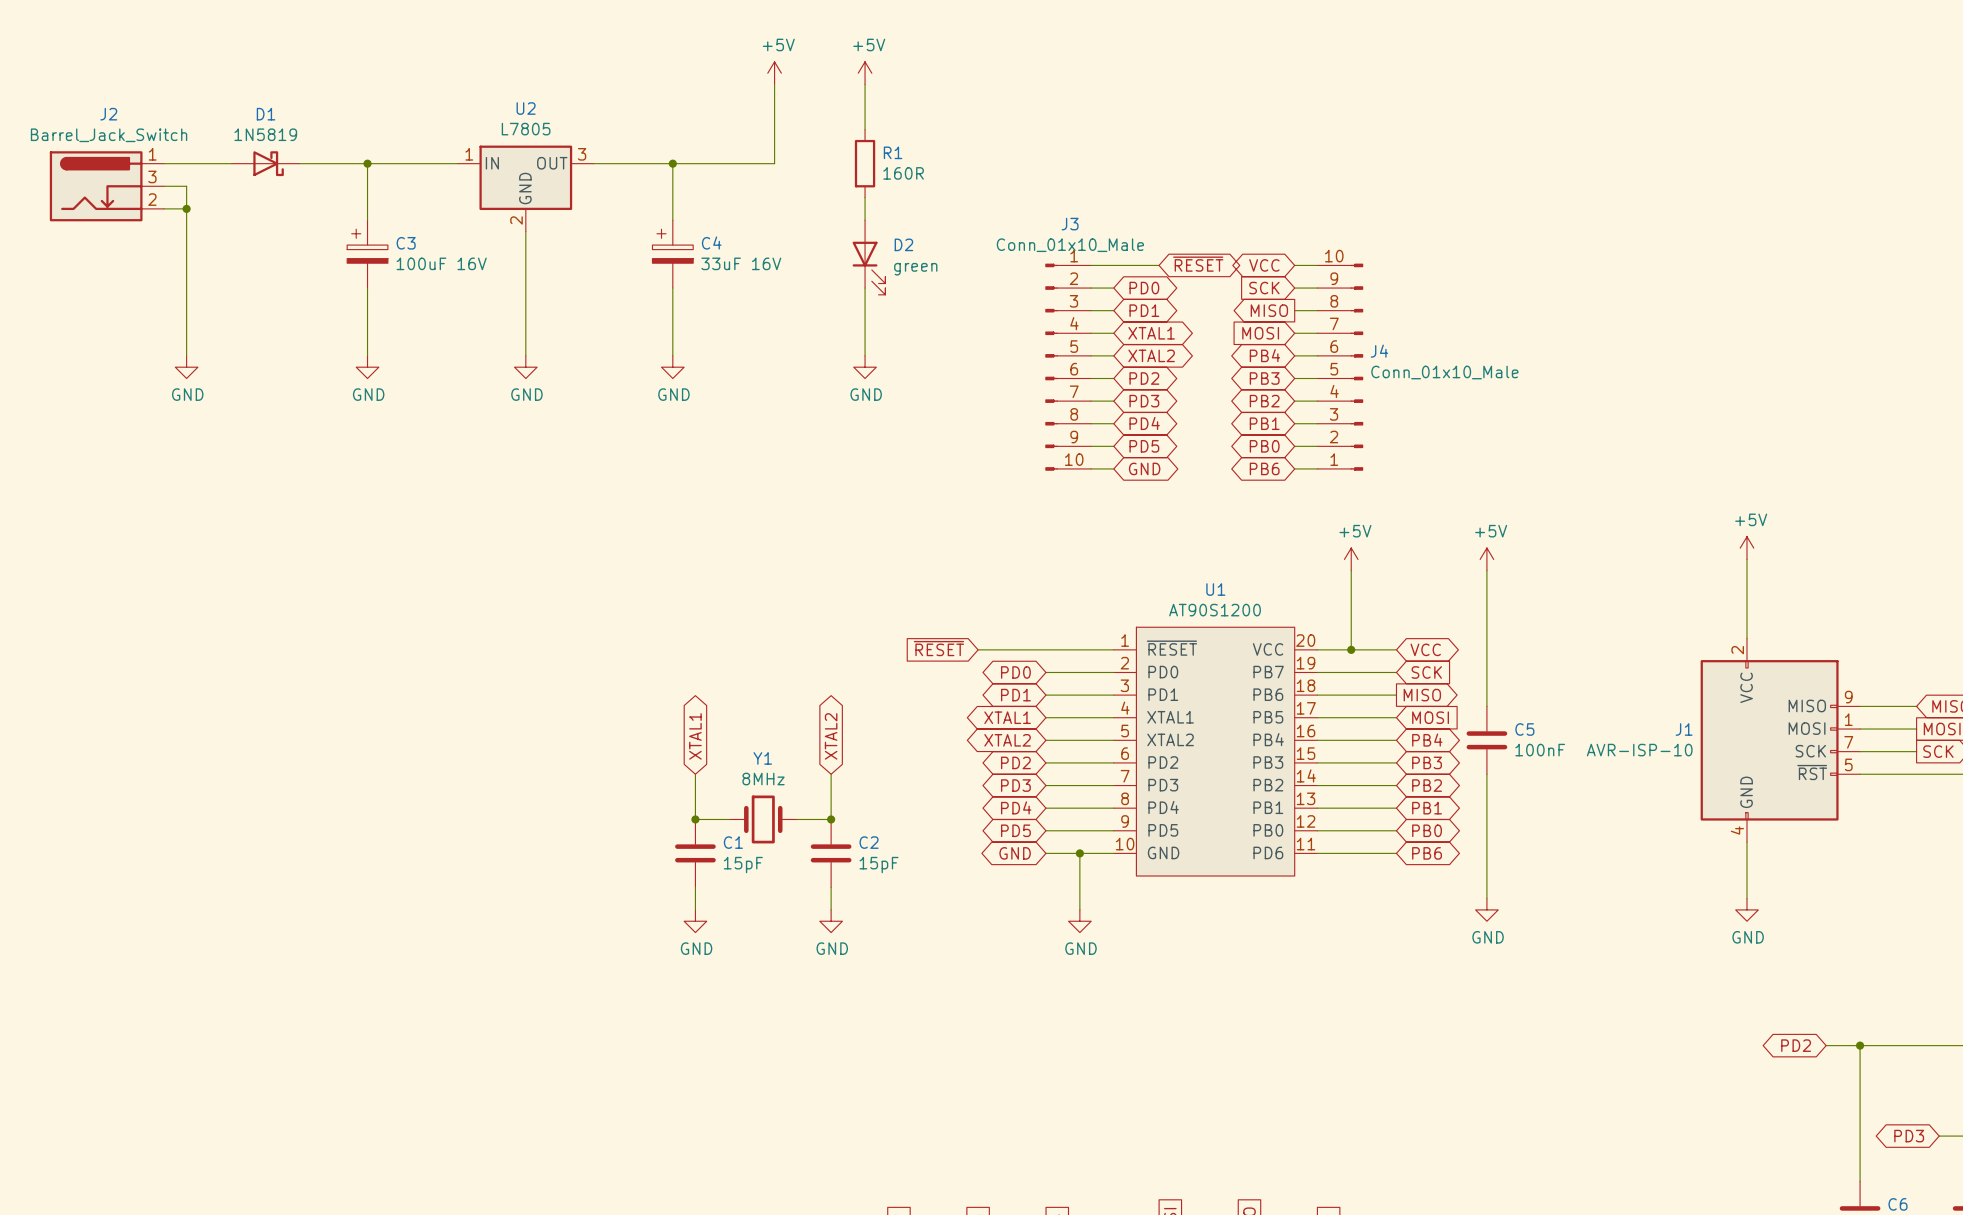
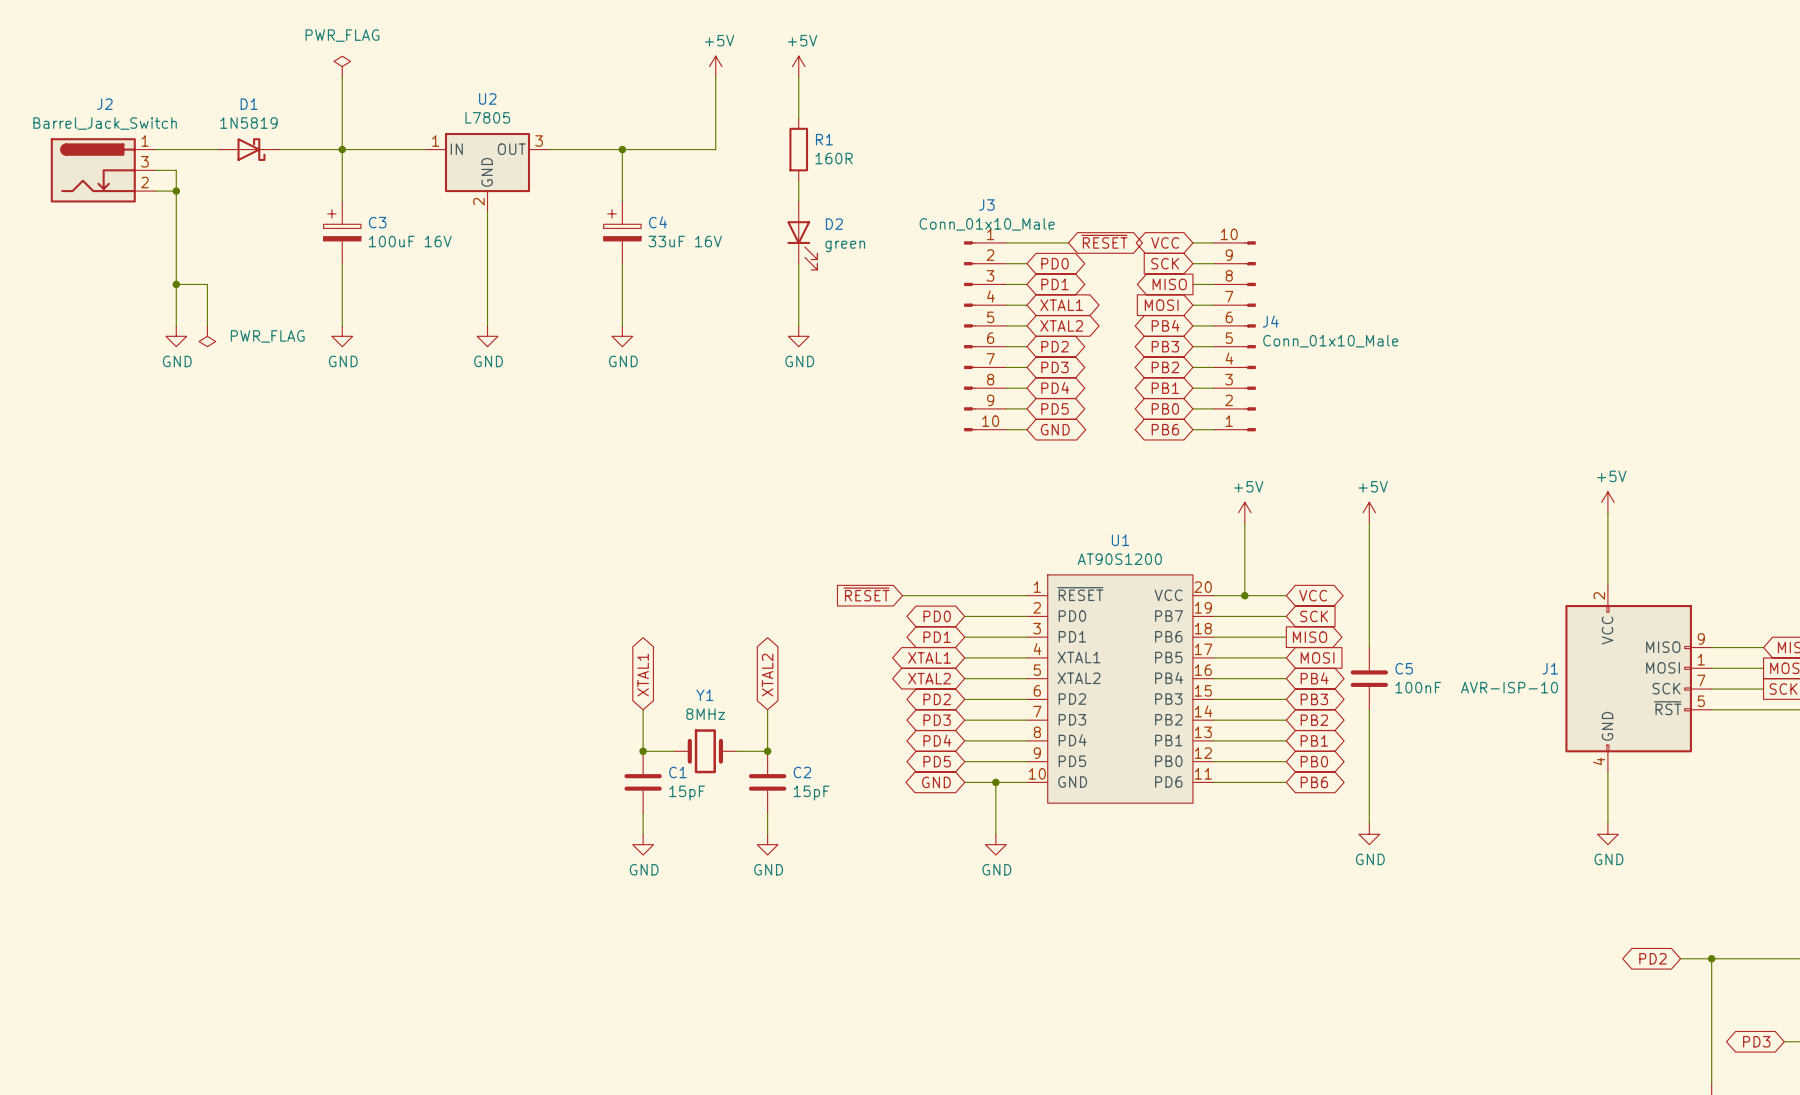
power symbol: none -> PWR_FLAG (342, 66)
wire: none -> (342, 76) (342, 149)
wire: none -> (176, 284) (207, 284) (207, 325)
junction: none -> (176, 284)
power symbol: none -> PWR_FLAG (207, 336)

